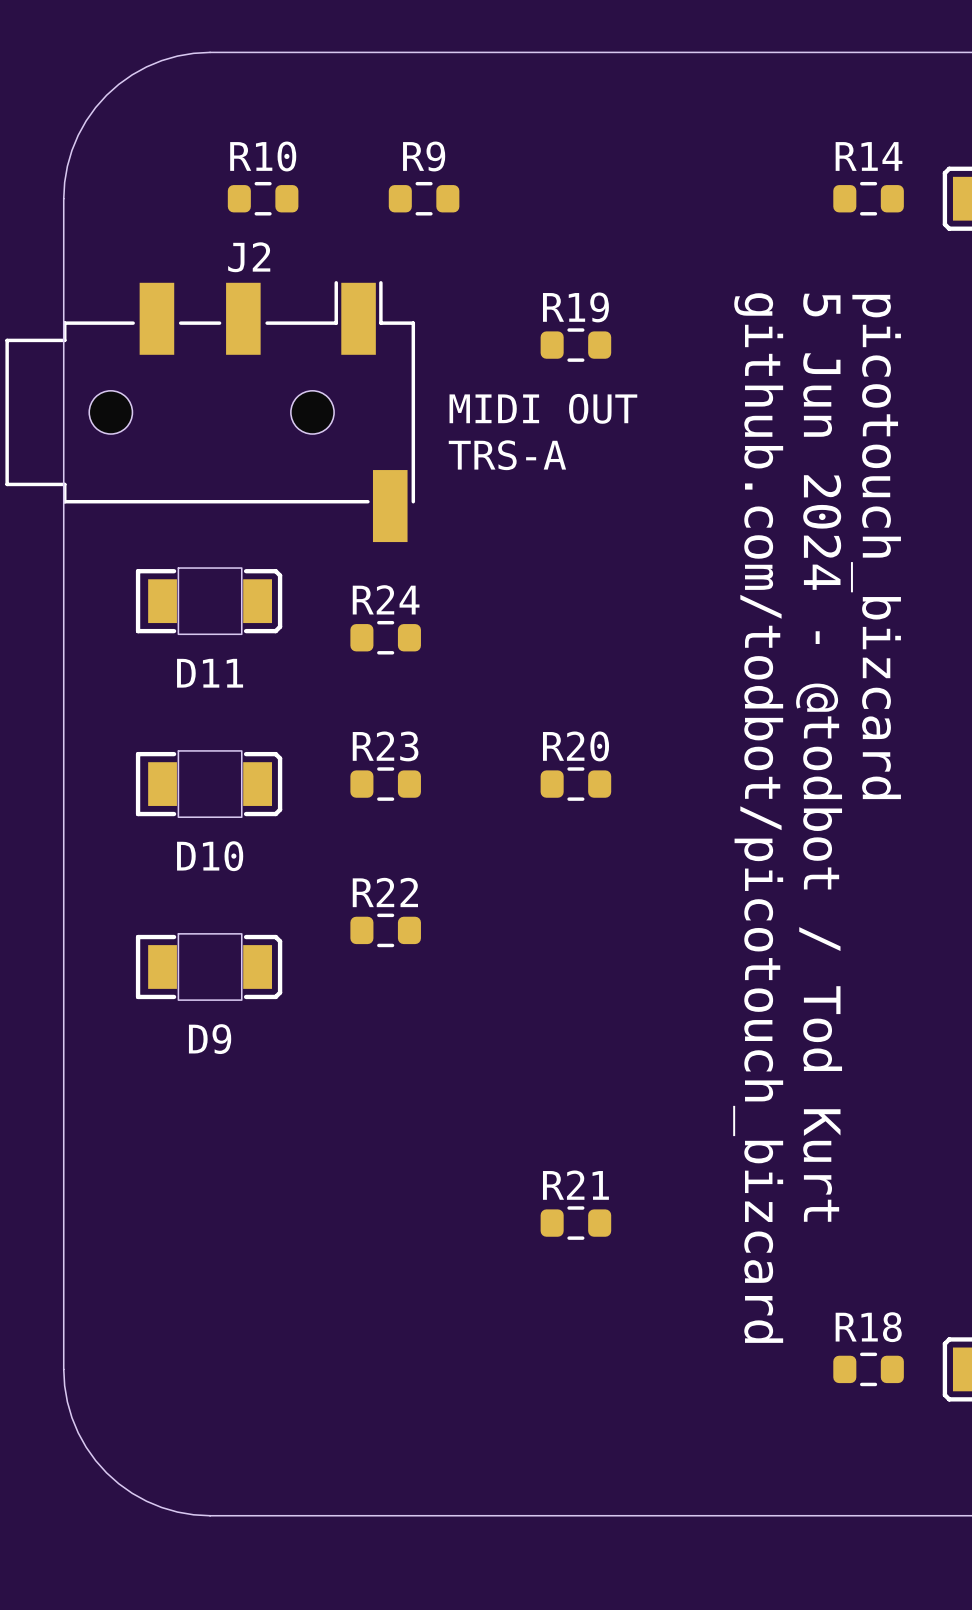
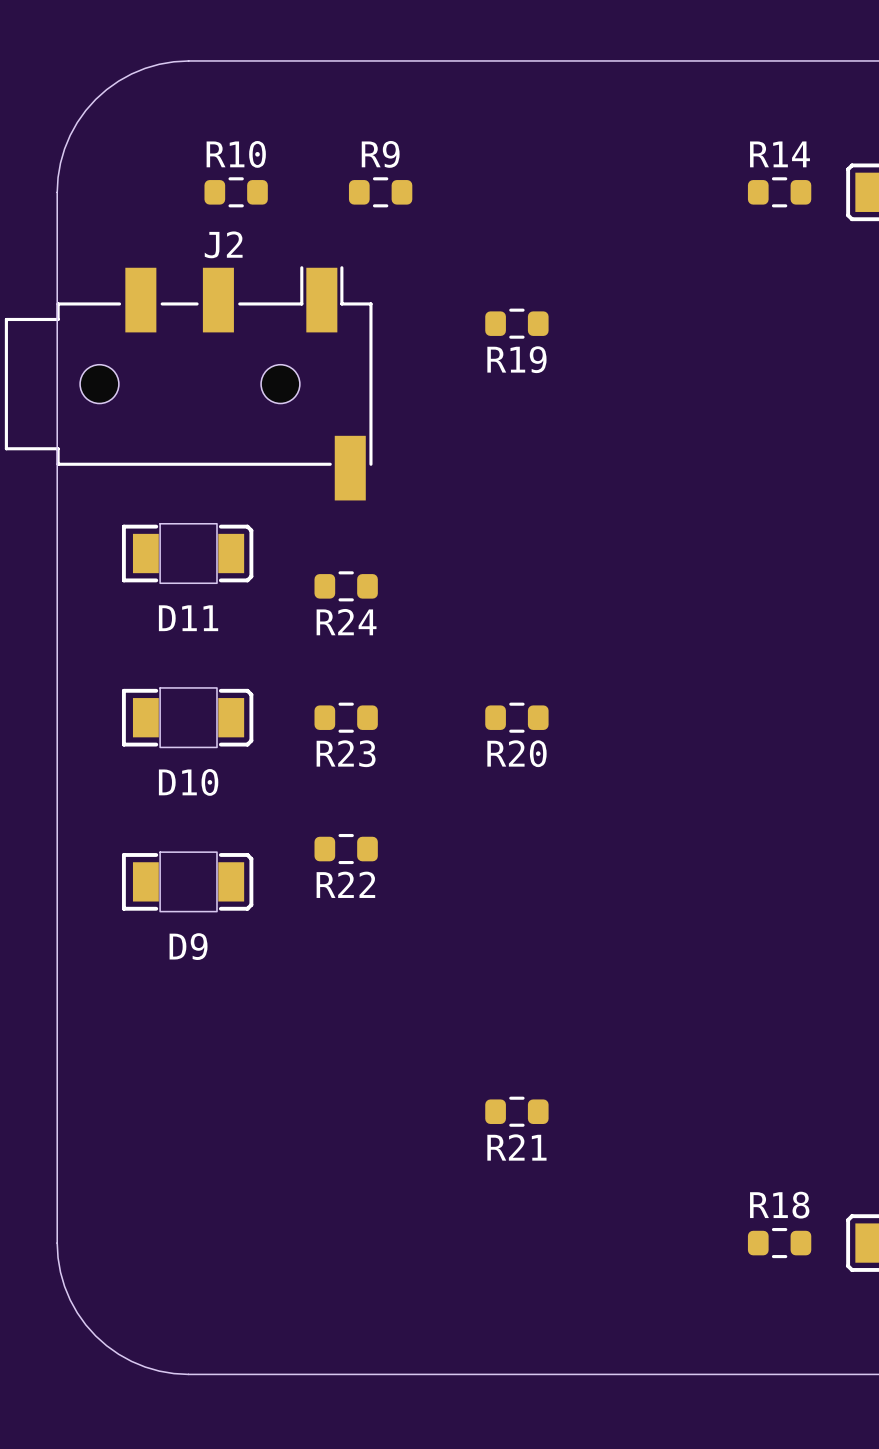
R19 name position: R19 (575, 307) -> R19 (516, 359)
text: MIDI OUT (543, 408) -> none
text: TRS-A (507, 455) -> none
text: picotouch_bizcard (875, 546) -> none
R24 name position: R24 (386, 599) -> R24 (346, 622)
R23 name position: R23 (385, 746) -> R23 (346, 753)
R20 name position: R20 (576, 746) -> R20 (517, 753)
text: 5 Jun 2024 - @todbot / Tod Kurt (819, 757) -> none
text: github.com/todbot/picotouch_bizcard (758, 818) -> none
R22 name position: R22 (385, 892) -> R22 (345, 884)
R21 name position: R21 (575, 1185) -> R21 (516, 1147)

